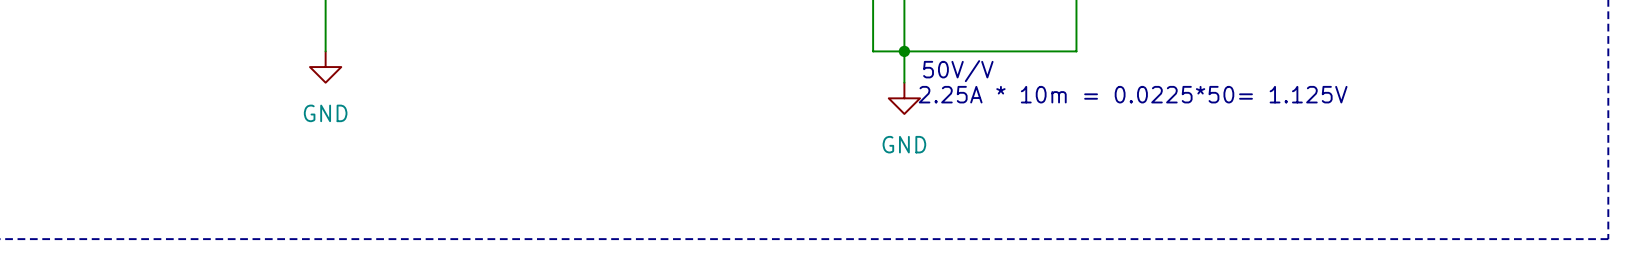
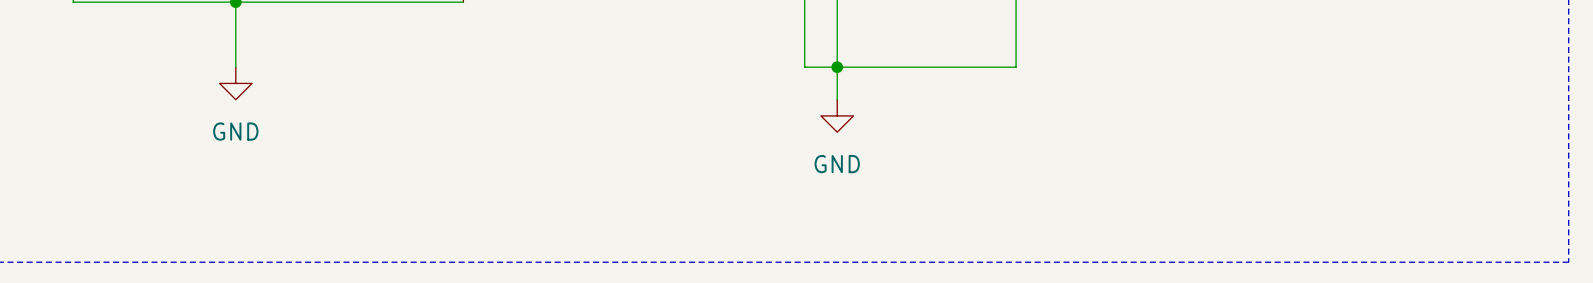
text: 50V/V (958, 71) -> none
text: 2.25A * 10m = 0.0225*50= 1.125V (1133, 94) -> none

